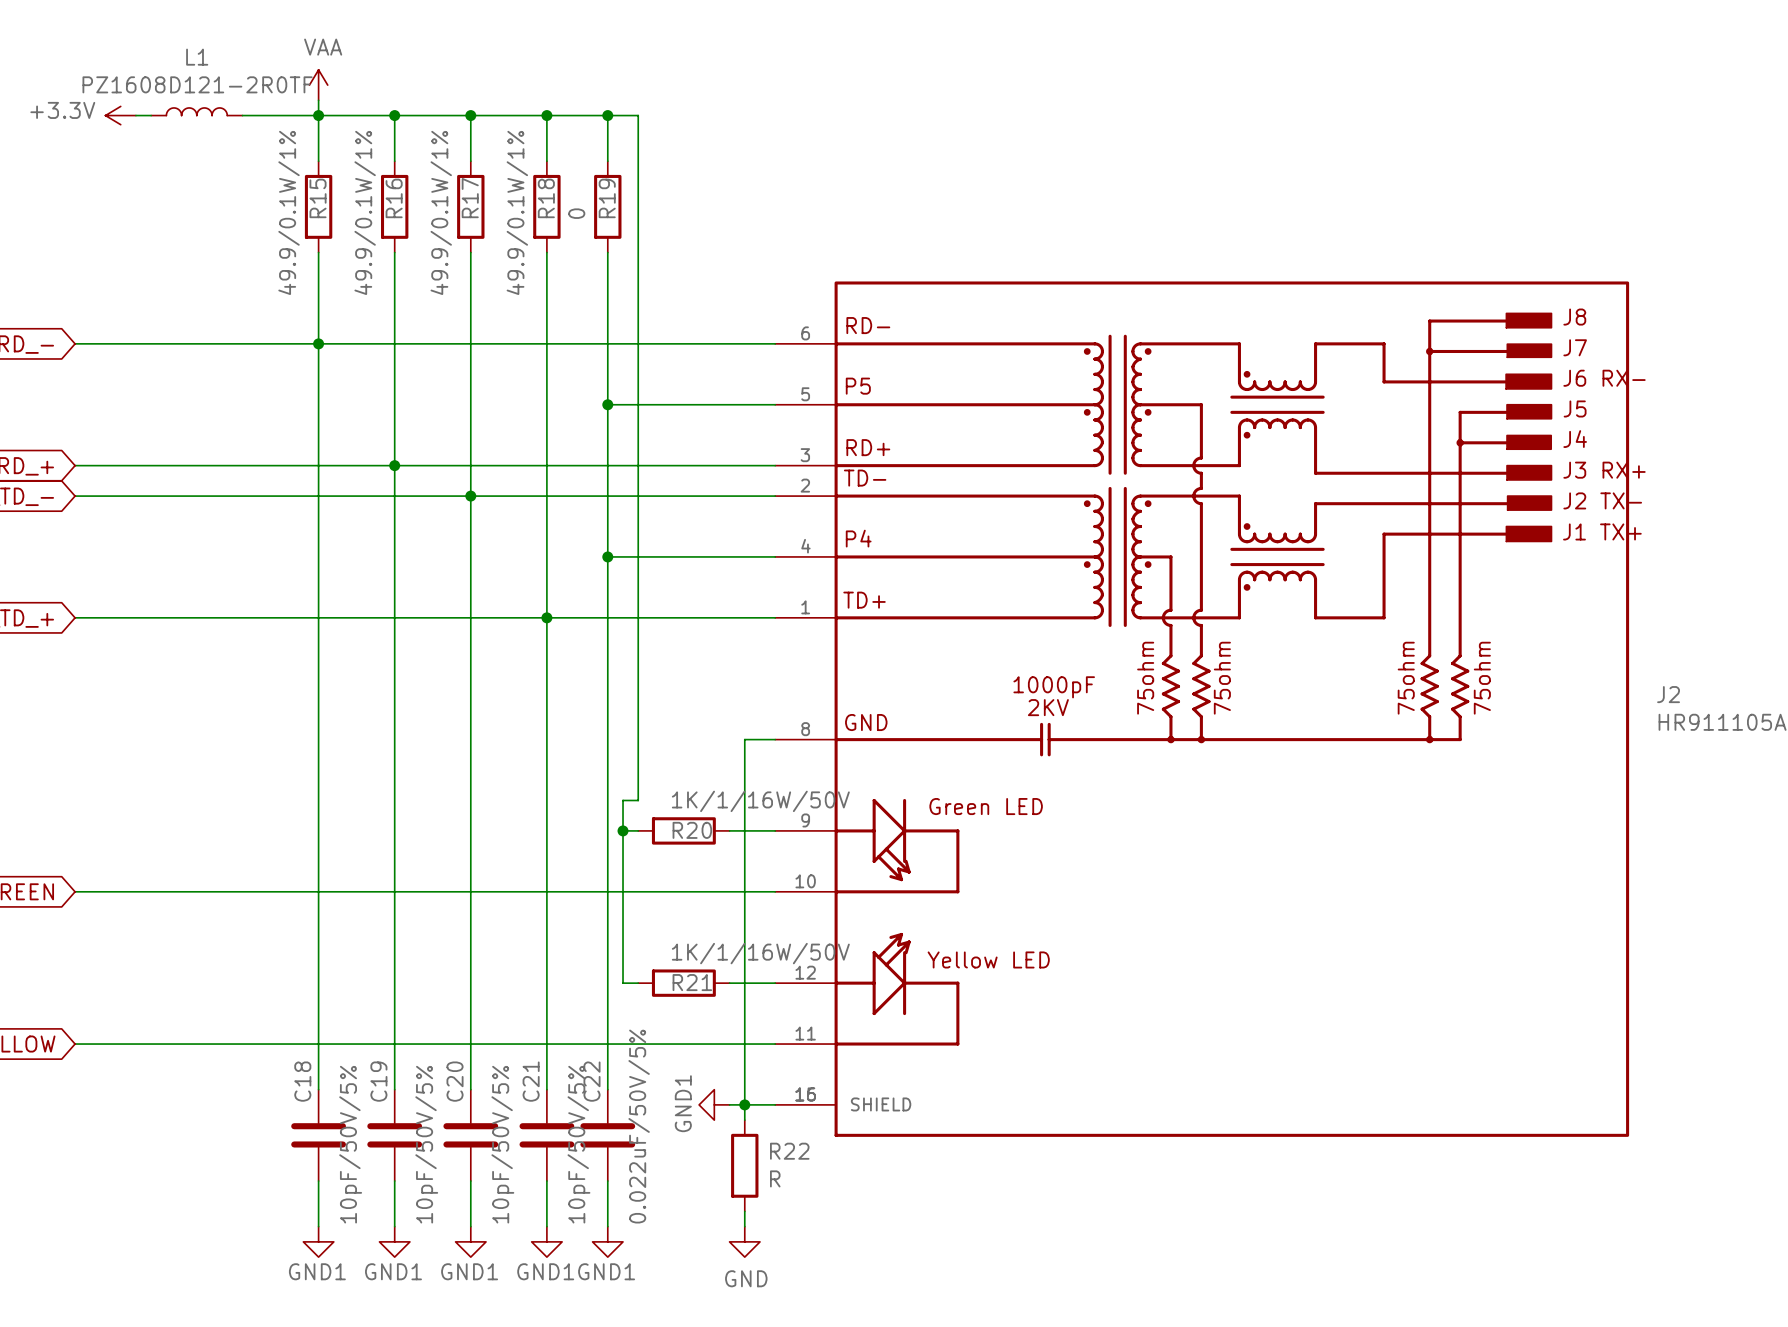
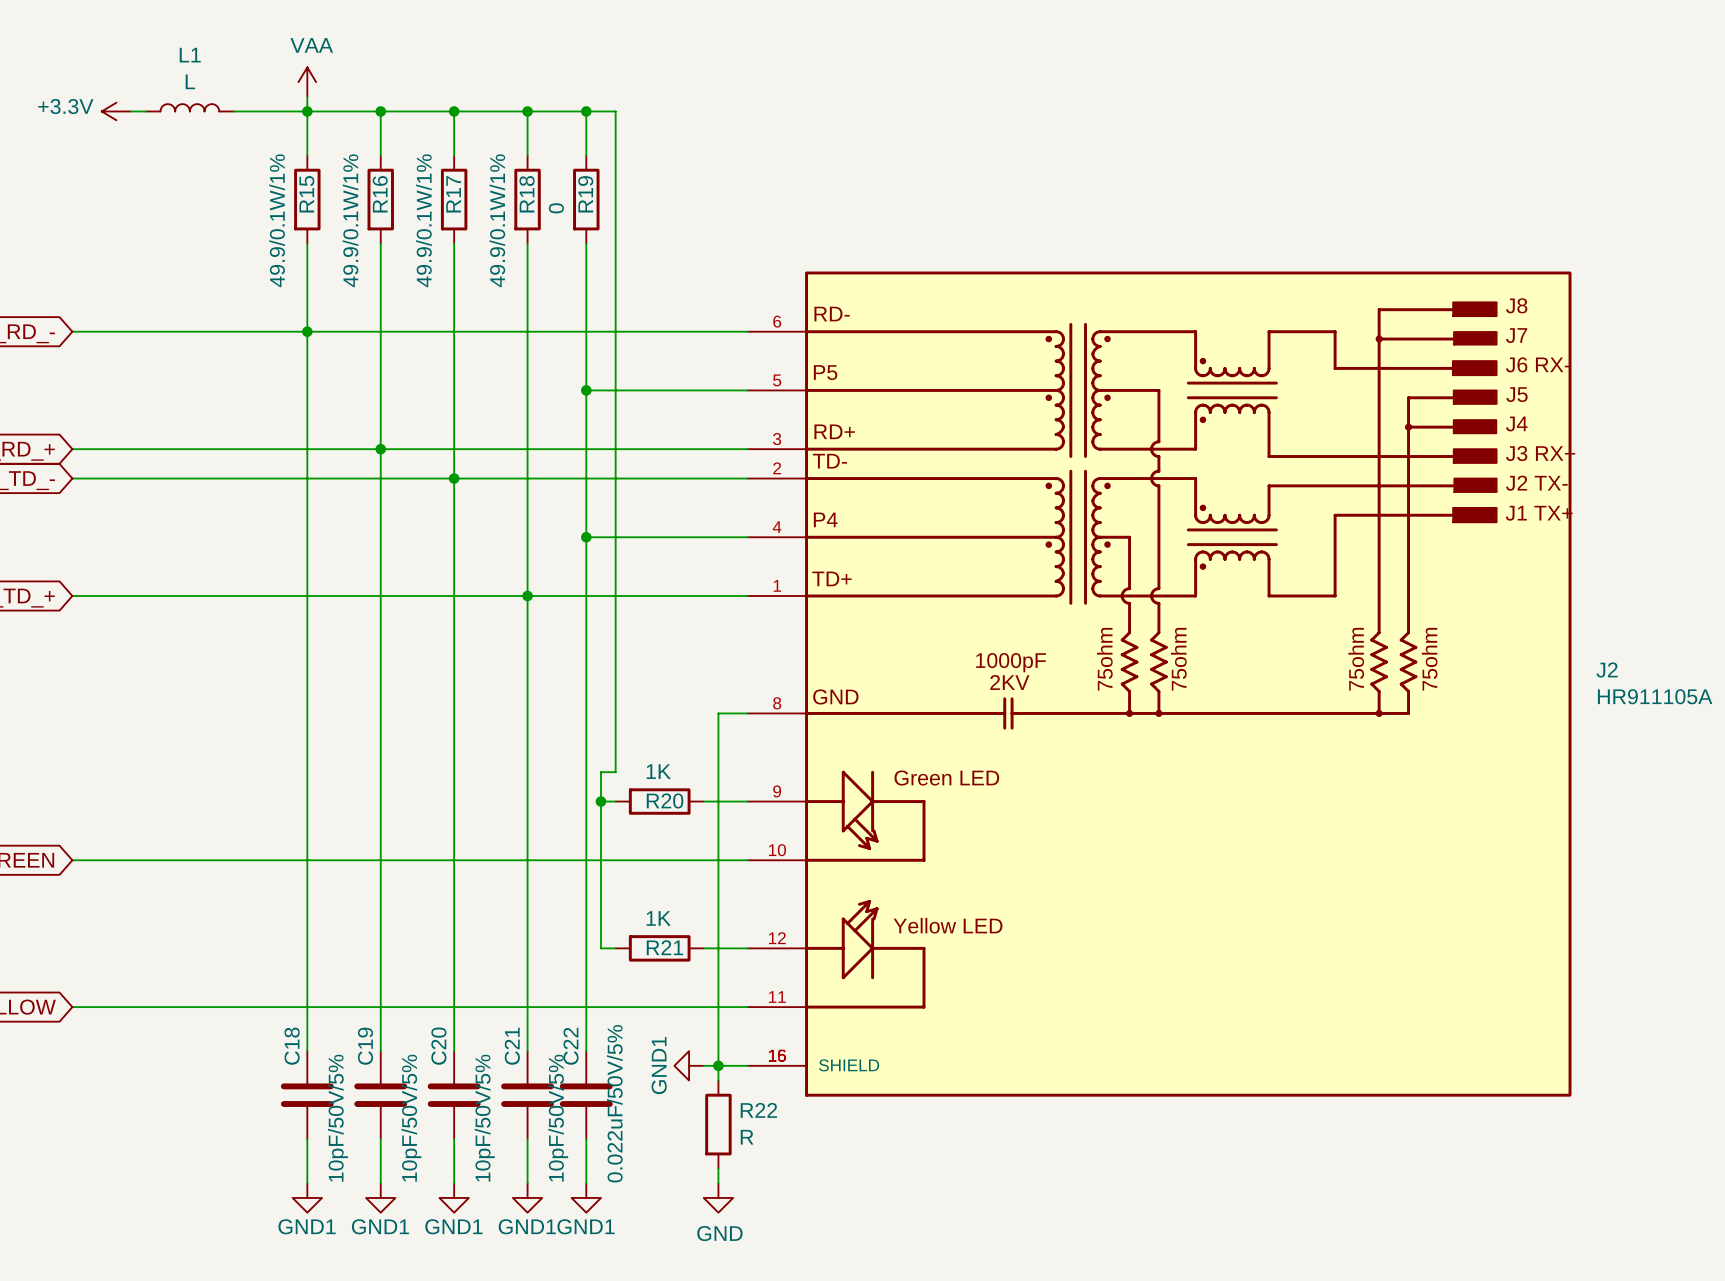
L1 value: PZ1608D121-2R0TF (197, 84) -> L (190, 81)
R20 value: 1K/1/16W/50V (760, 801) -> 1K (658, 771)
R21 value: 1K/1/16W/50V (760, 953) -> 1K (658, 918)

